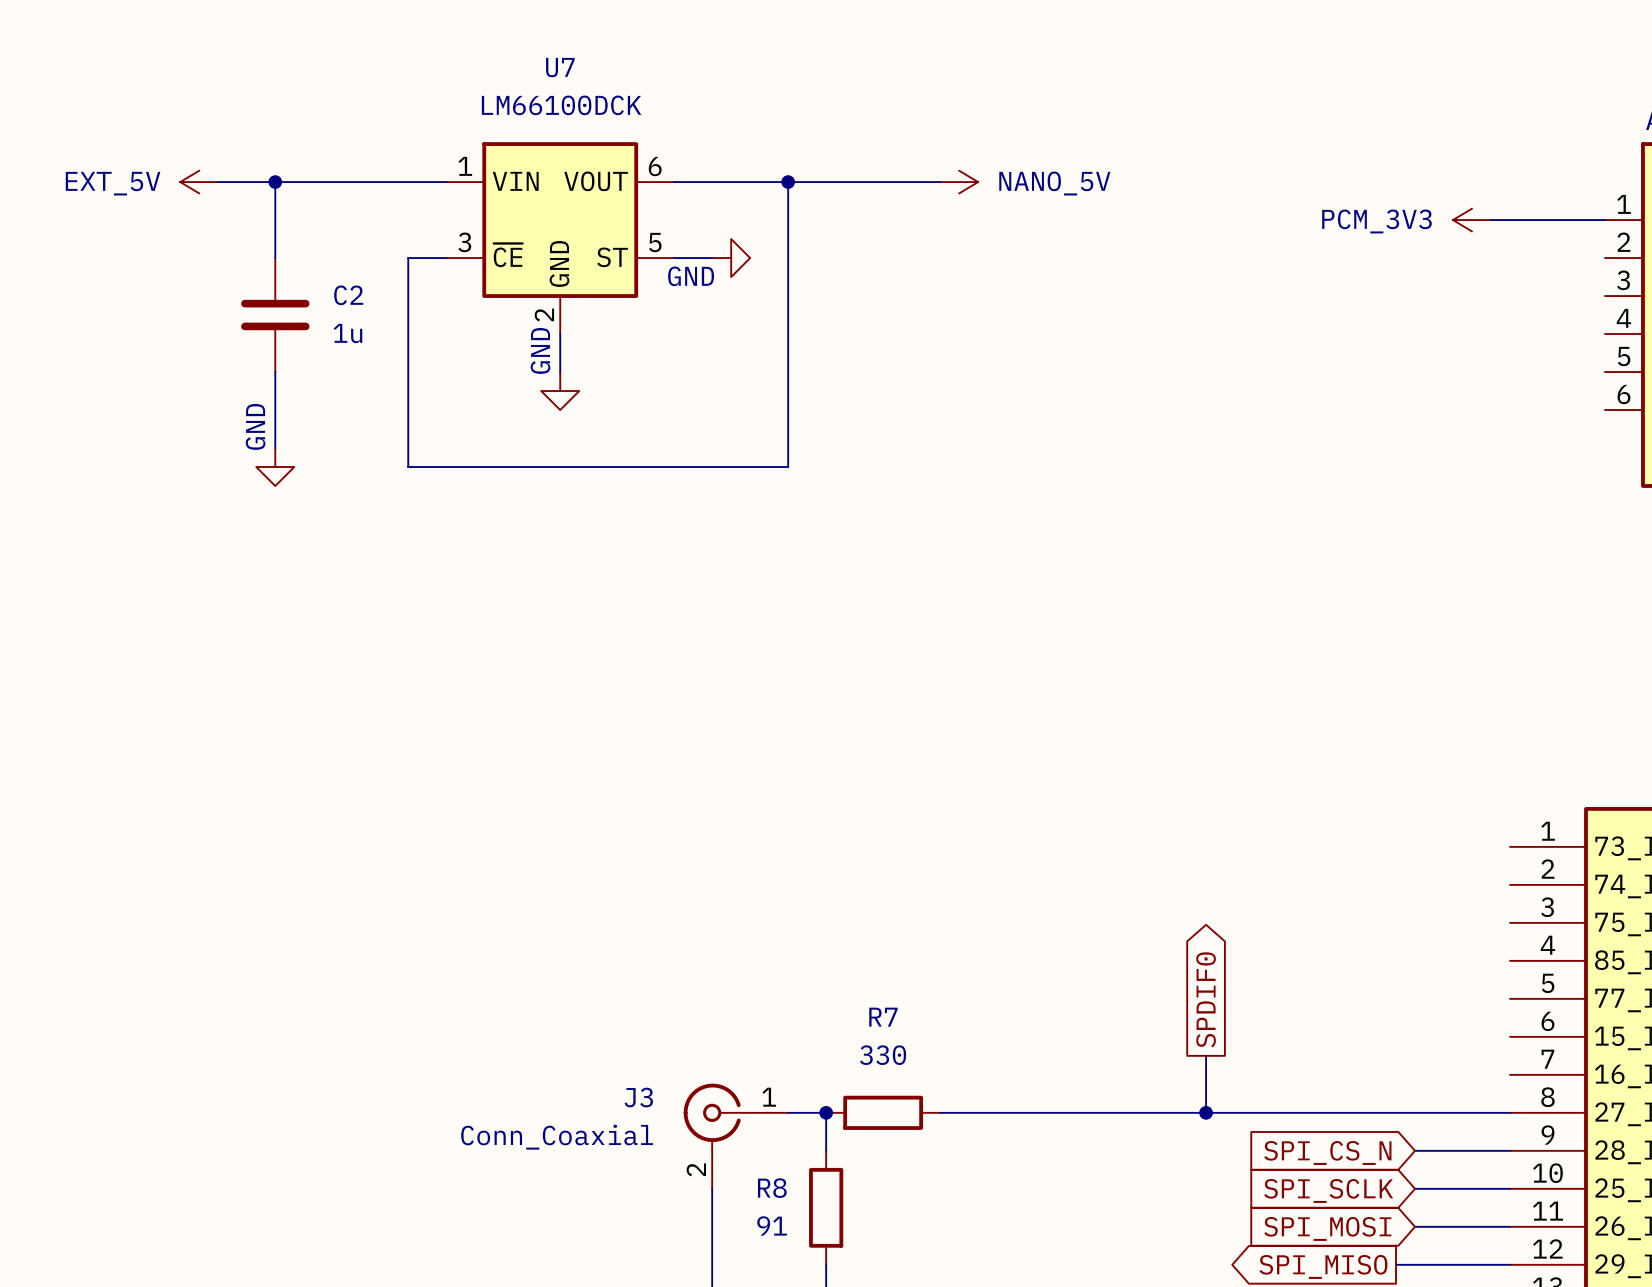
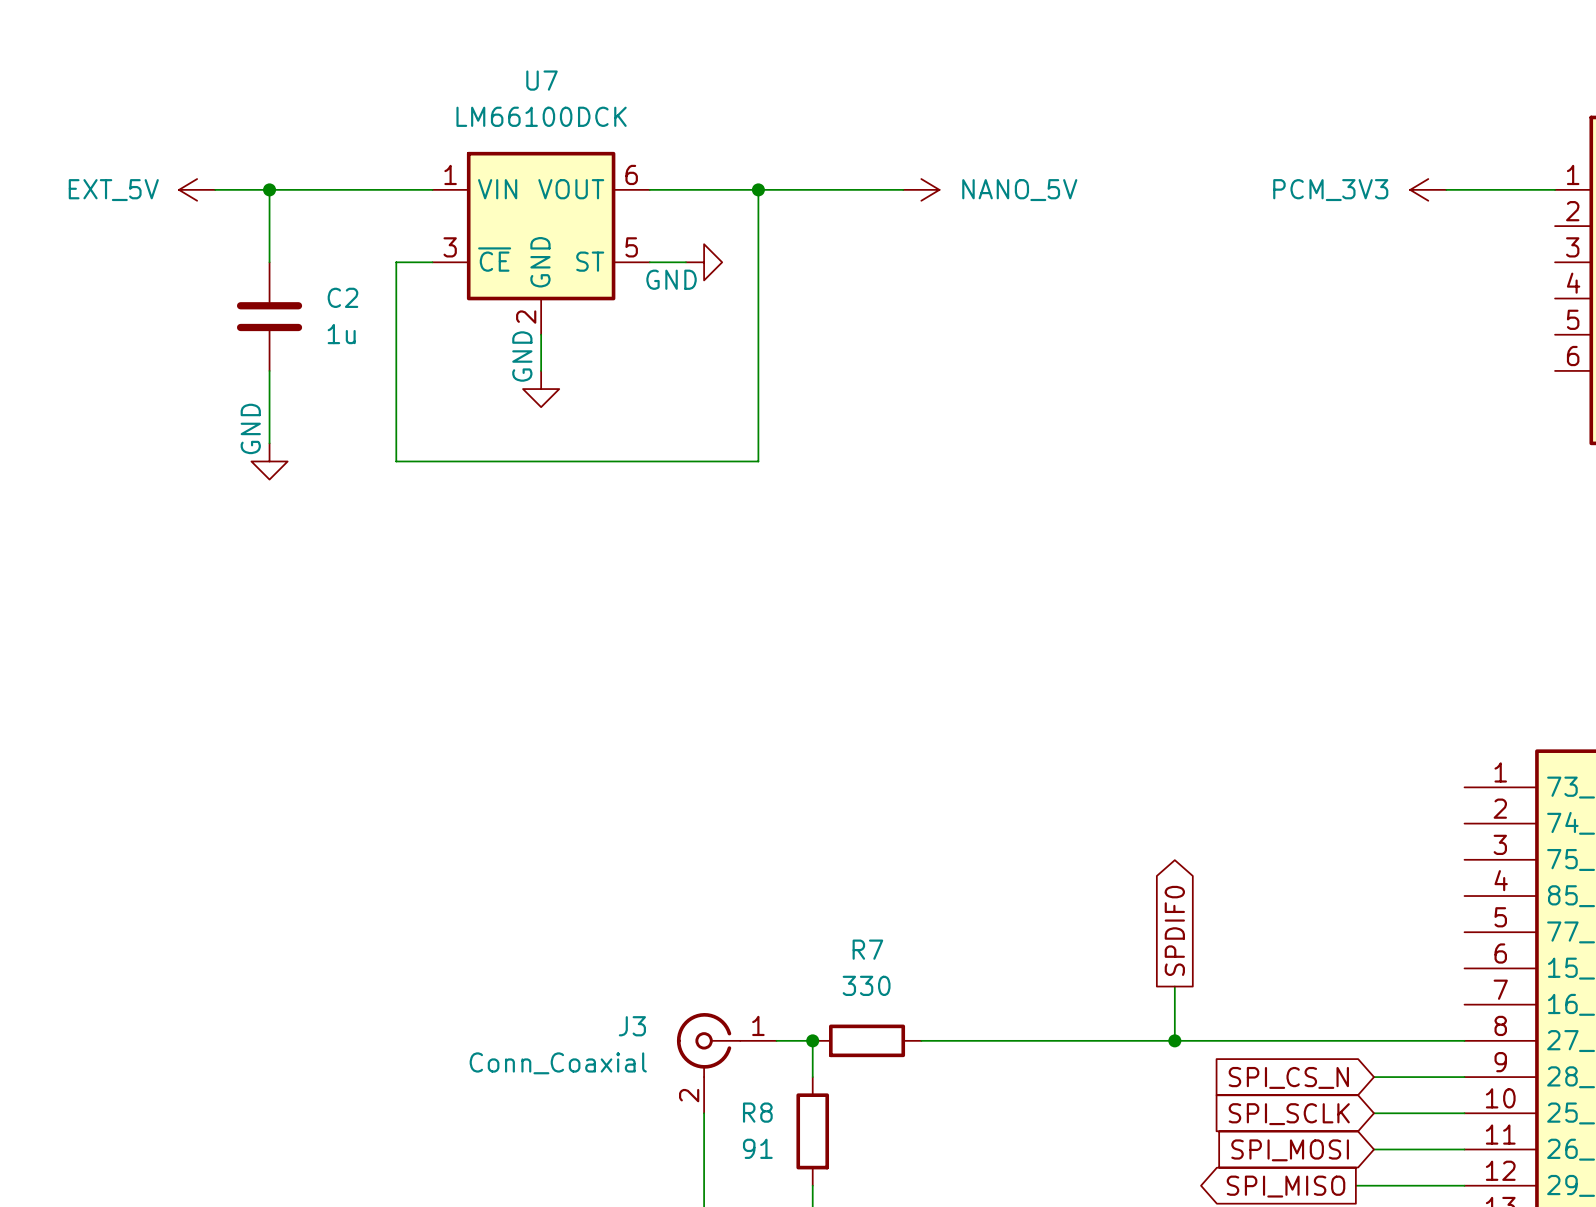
power symbol position: EXT_5V (199, 182) -> EXT_5V (197, 189)
wire: (218, 182) (446, 182) -> (215, 189) (432, 189)
wire: (275, 182) (275, 258) -> (269, 189) (269, 262)
junction position: (275, 182) -> (269, 189)
wire: (674, 182) (940, 182) -> (649, 189) (903, 189)
wire: (788, 182) (788, 467) (408, 467) (408, 258) (446, 258) -> (758, 189) (758, 461) (396, 461) (396, 262) (432, 262)
junction position: (788, 182) -> (758, 189)
power symbol position: NANO_5V (959, 182) -> NANO_5V (921, 189)
U7 position: (560, 238) -> (541, 243)
wire: (674, 258) (712, 258) -> (649, 262) (685, 262)
power symbol position: GND (731, 258) -> GND (704, 262)
C2 position: (275, 315) -> (269, 316)
wire: (560, 334) (560, 372) -> (541, 334) (541, 370)
wire: (275, 372) (275, 448) -> (269, 370) (269, 443)
power symbol position: GND (560, 391) -> GND (541, 389)
power symbol position: GND (275, 467) -> GND (269, 461)

